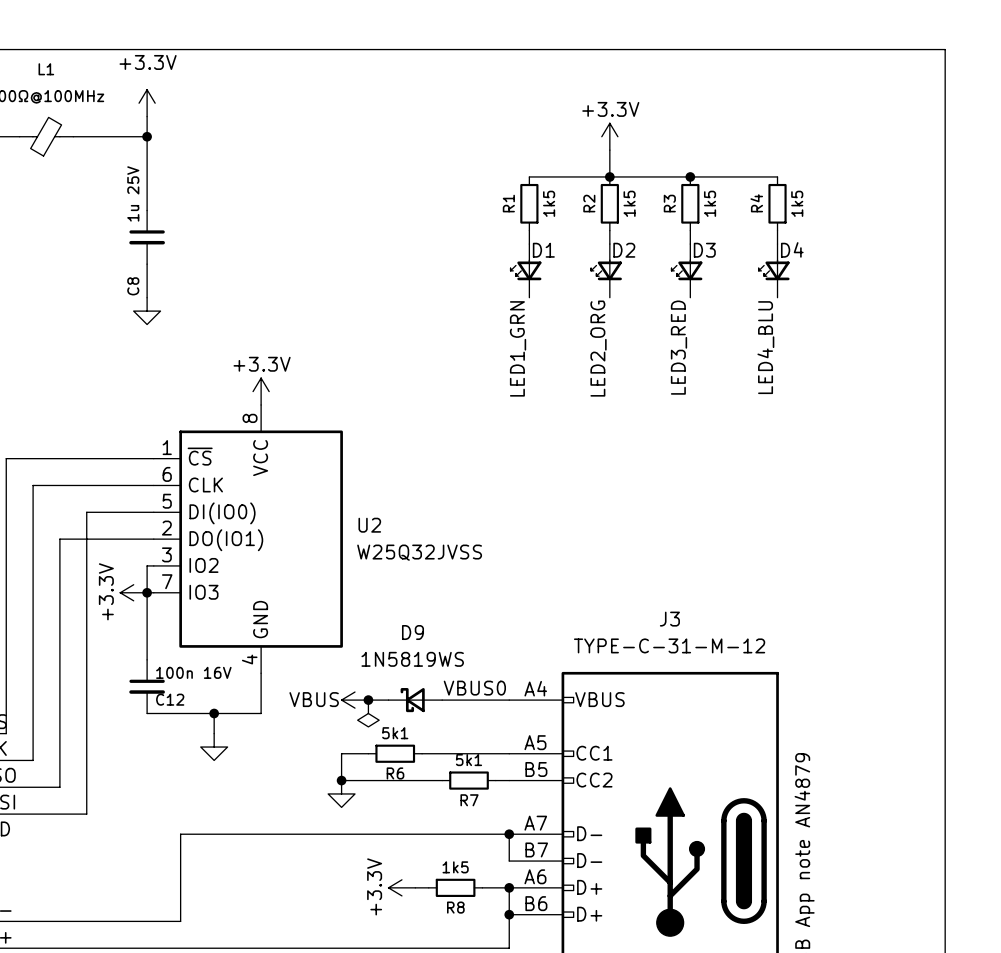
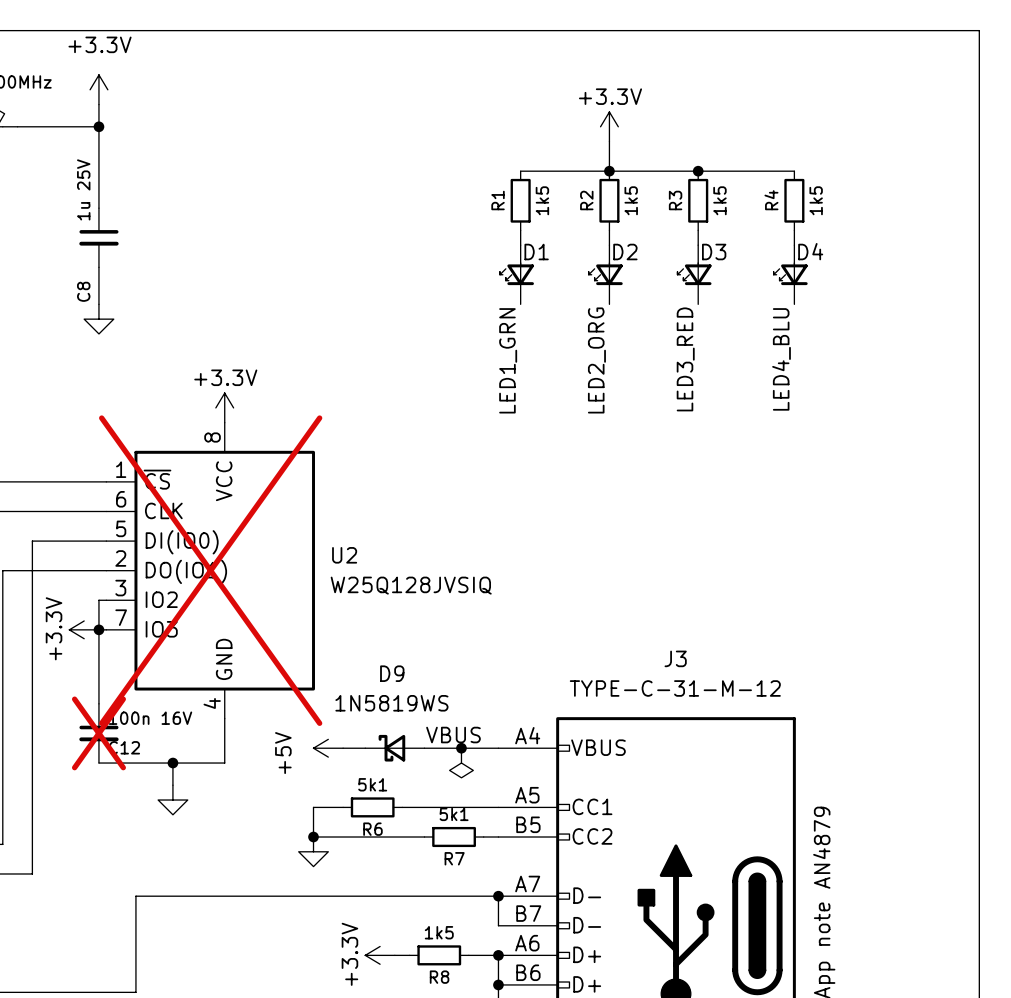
U2 do-not-place cross: none -> (210, 570)
U2 value: W25Q32JVSS (419, 552) -> W25Q128JVSIQ (411, 585)
C12 do-not-place cross: none -> (98, 733)
label: VBUS0 (474, 688) -> VBUS (453, 735)
power symbol: VBUS (355, 700) -> +5V (328, 748)
junction: (368, 700) -> none
junction: none -> (461, 748)
power symbol position: (368, 713) -> (461, 763)

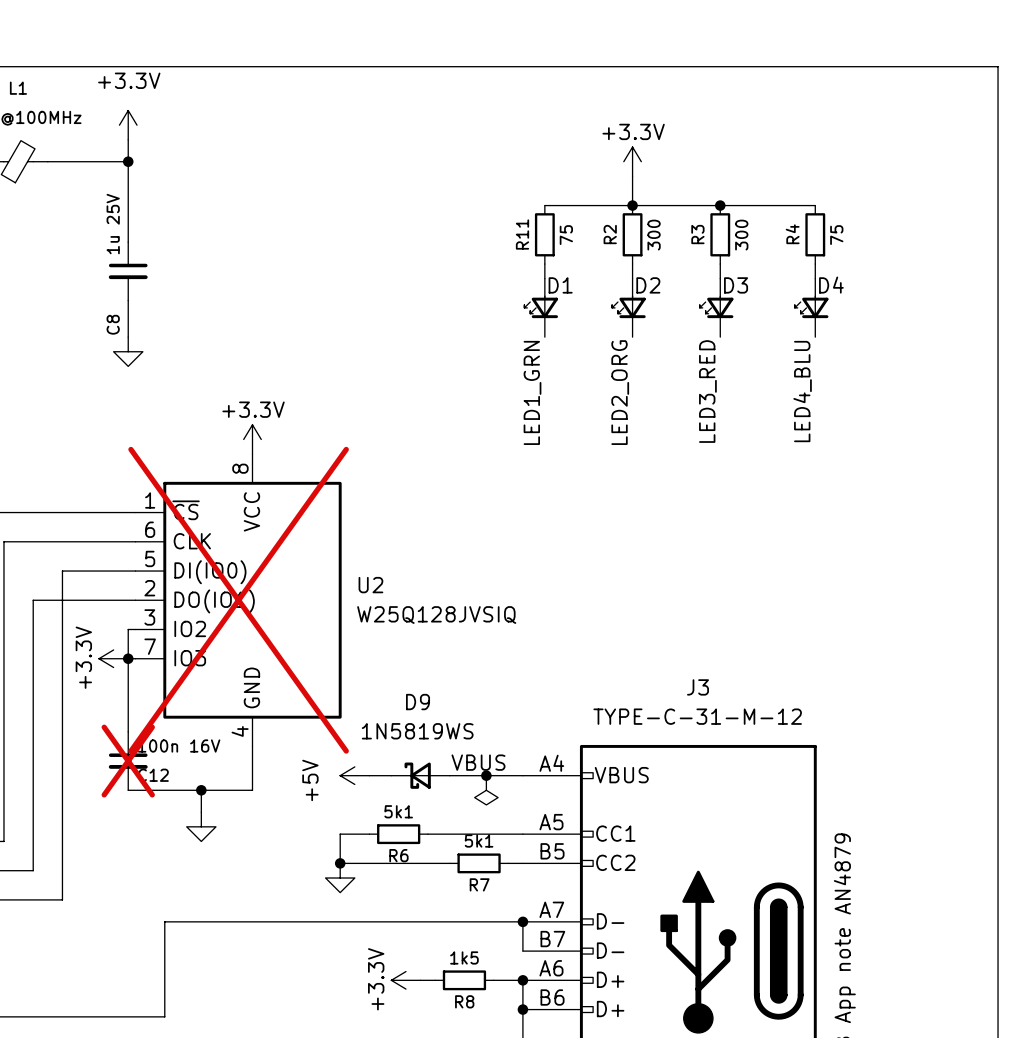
R1 name: R1 (498, 200) -> R11 (522, 234)
R1 value: 1k5 (542, 200) -> 75 (566, 235)
R2 value: 1k5 (631, 200) -> 300 (654, 235)
R3 value: 1k5 (719, 200) -> 300 (741, 235)
R4 value: 1k5 (816, 200) -> 75 (836, 235)

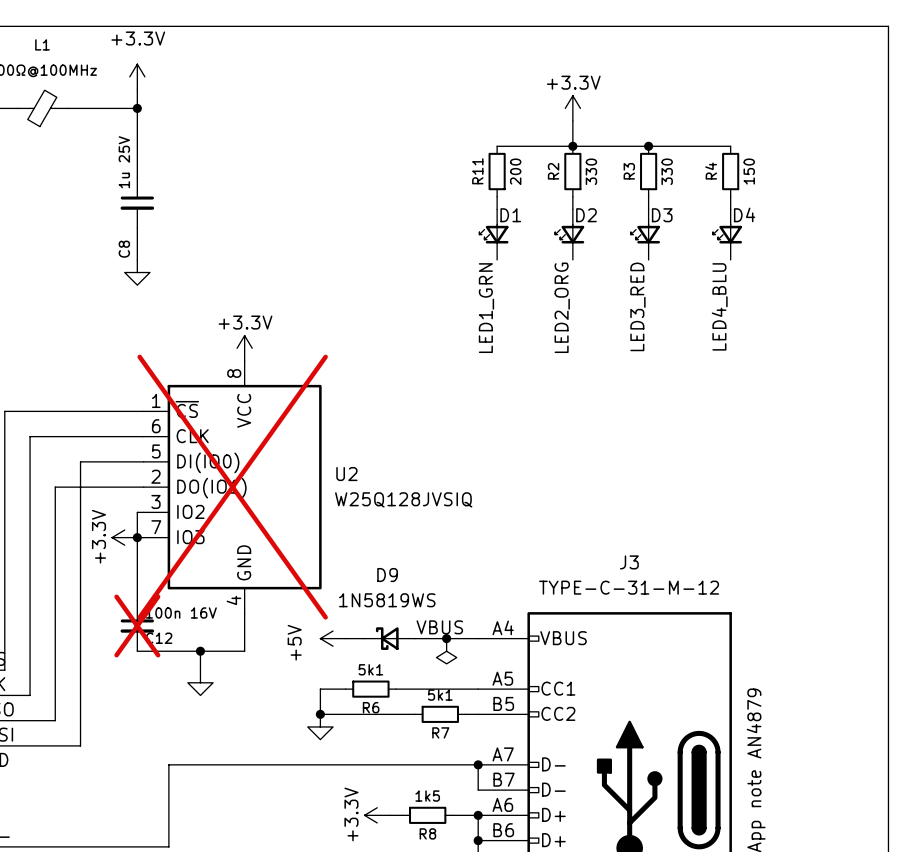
R11 value: 75 (566, 235) -> 200 (515, 171)
R2 value: 300 (654, 235) -> 330 (591, 171)
R3 value: 300 (741, 235) -> 330 (667, 171)
R4 value: 75 (836, 235) -> 150 (749, 171)

